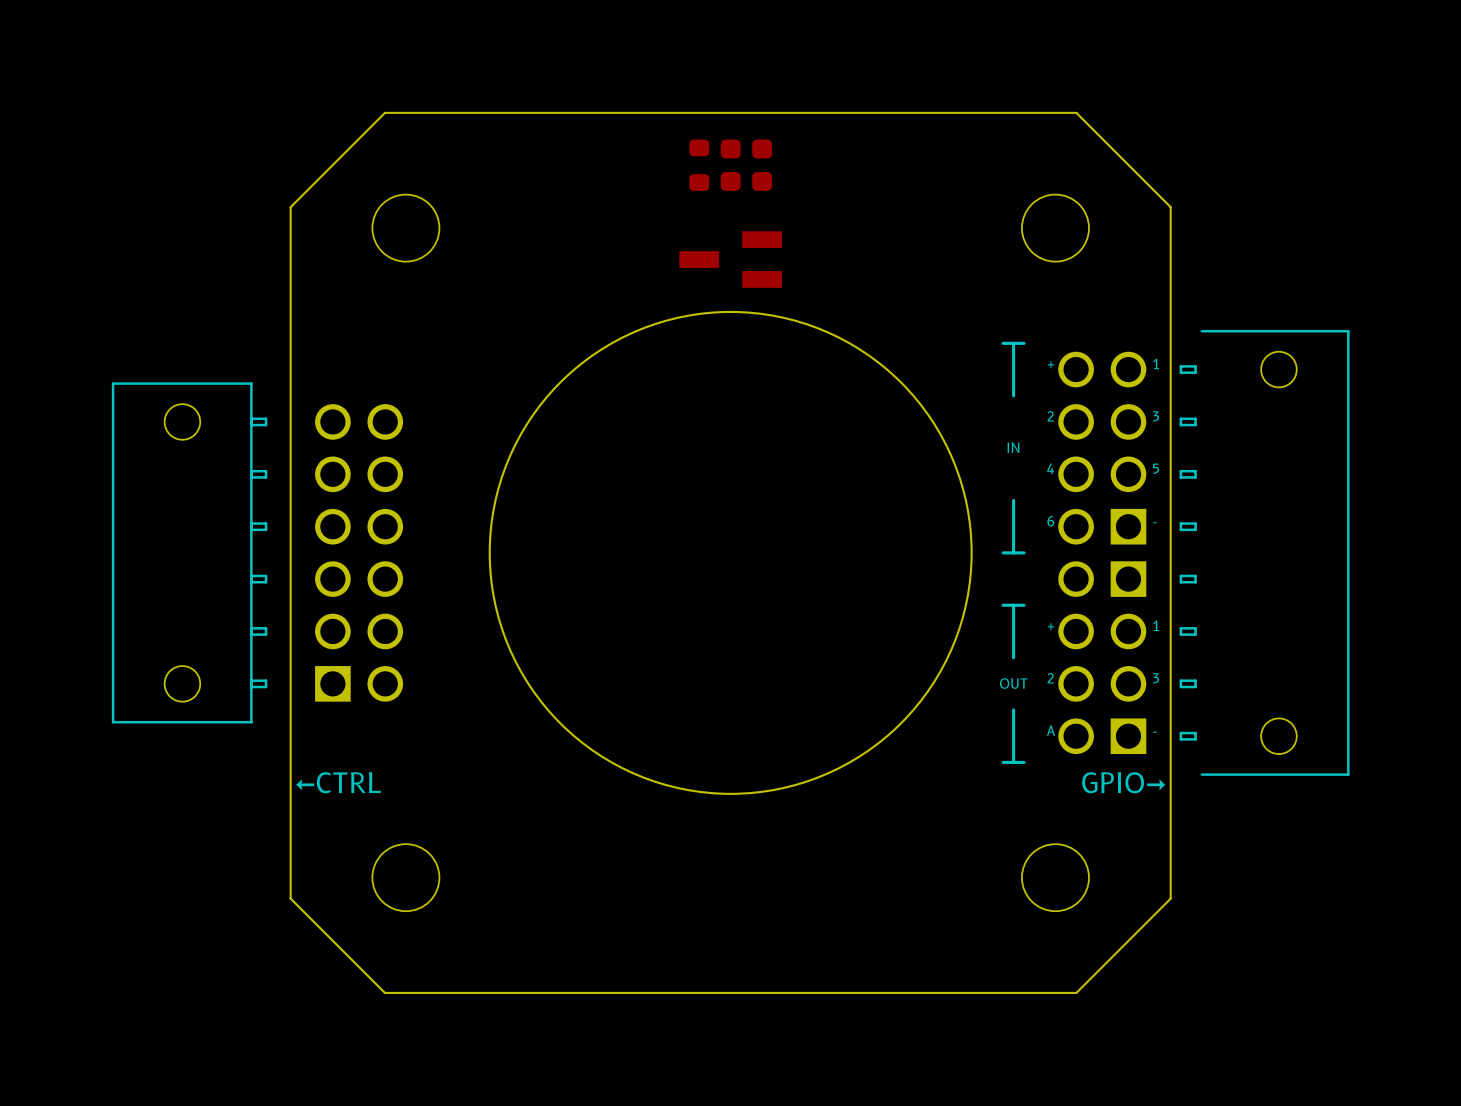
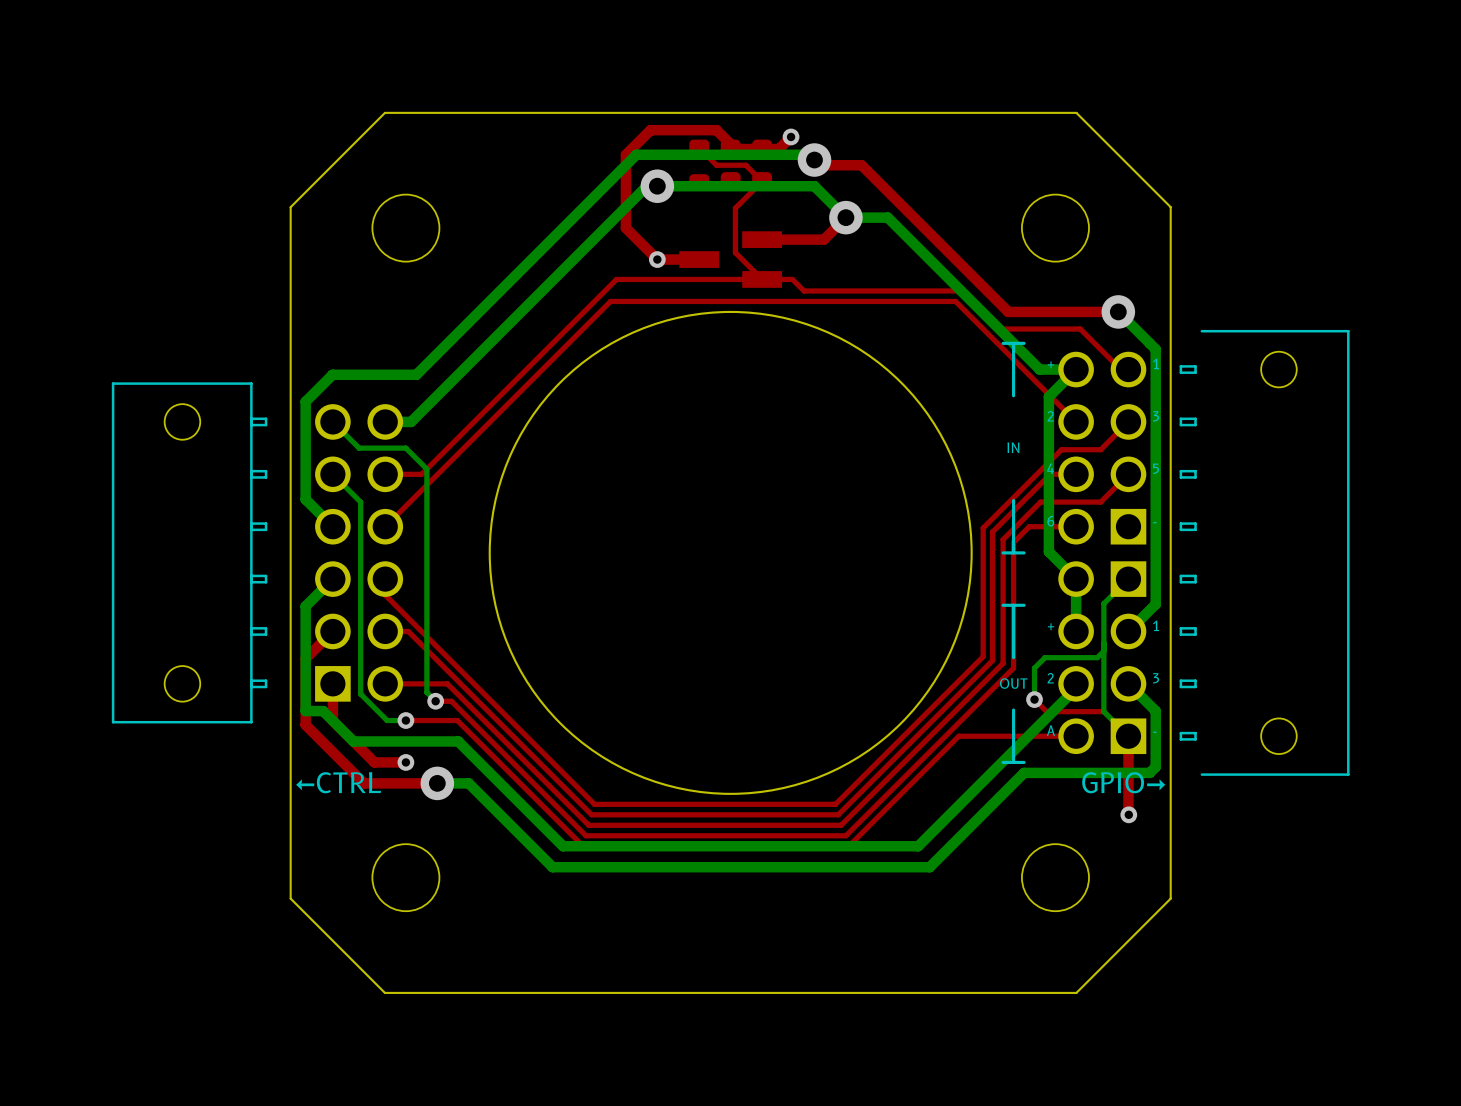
top track: none -> (791, 136) (779, 149) (730, 149) (730, 144) (716, 130) (650, 130) (625, 154) (625, 228) (657, 259) (699, 259)
via: none -> (791, 136)
top track: none -> (699, 147) (716, 165) (745, 165) (762, 181) (735, 208) (735, 252) (762, 279)
top track: none -> (814, 160) (814, 165) (861, 165) (1008, 311) (1118, 311)
bottom track: none -> (814, 160) (809, 154) (636, 154) (416, 374) (332, 374) (305, 401) (305, 499) (332, 526)
via: none -> (814, 160)
via: none -> (657, 186)
top track: none -> (845, 217) (823, 239) (762, 239)
via: none -> (845, 217)
via: none -> (657, 259)
bottom track: none -> (1118, 311) (1155, 349) (1155, 604) (1128, 631)
via: none -> (1118, 311)
top track: none -> (1128, 369) (1120, 369) (1080, 329) (996, 329) (958, 290) (804, 290) (792, 279) (616, 279) (421, 474) (385, 474)
bottom track: none -> (332, 421) (359, 448) (405, 448) (426, 469) (426, 692) (435, 701)
bottom track: none -> (385, 421) (411, 421) (646, 186) (814, 186) (845, 217) (887, 217) (1039, 369) (1076, 369) (1048, 396) (1048, 551) (1076, 579) (1076, 631)
top track: none -> (1076, 421) (955, 301) (610, 301) (385, 526)
top track: none -> (1128, 421) (1100, 449) (1061, 449) (983, 528) (983, 656) (835, 804) (594, 804) (385, 595) (385, 579)
bottom track: none -> (332, 474) (360, 502) (360, 694) (387, 720) (405, 720)
top track: none -> (1076, 474) (1050, 474) (992, 531) (992, 660) (838, 814) (591, 814) (408, 631) (385, 631)
top track: none -> (1128, 474) (1100, 502) (1040, 502) (1003, 539) (1003, 663) (841, 825) (588, 825) (447, 683) (385, 683)
top track: none -> (1076, 526) (1029, 526) (1013, 542) (1013, 668) (845, 835) (585, 835) (451, 701) (435, 701)
bottom track: none -> (332, 579) (305, 606) (305, 711) (323, 711) (353, 741) (458, 741) (563, 846) (918, 846) (1076, 688) (1076, 683)
bottom track: none -> (1128, 579) (1103, 603) (1103, 711) (1128, 736)
top track: none -> (332, 631) (305, 658) (305, 725) (364, 783) (437, 783)
bottom track: none -> (1103, 651) (1097, 657) (1044, 657) (1034, 668) (1034, 699)
top track: none -> (332, 683) (332, 720) (374, 762) (405, 762)
bottom track: none -> (1128, 683) (1155, 711) (1155, 766) (1149, 772) (1024, 772) (929, 867) (552, 867) (468, 783) (437, 783)
top track: none -> (1034, 699) (1046, 711) (1103, 711) (1128, 736) (1128, 814)
via: none -> (1034, 699)
via: none -> (435, 701)
top track: none -> (405, 720) (457, 720) (582, 845) (849, 845) (958, 736) (1076, 736)
via: none -> (405, 720)
via: none -> (405, 762)
via: none -> (437, 783)
via: none -> (1128, 814)

